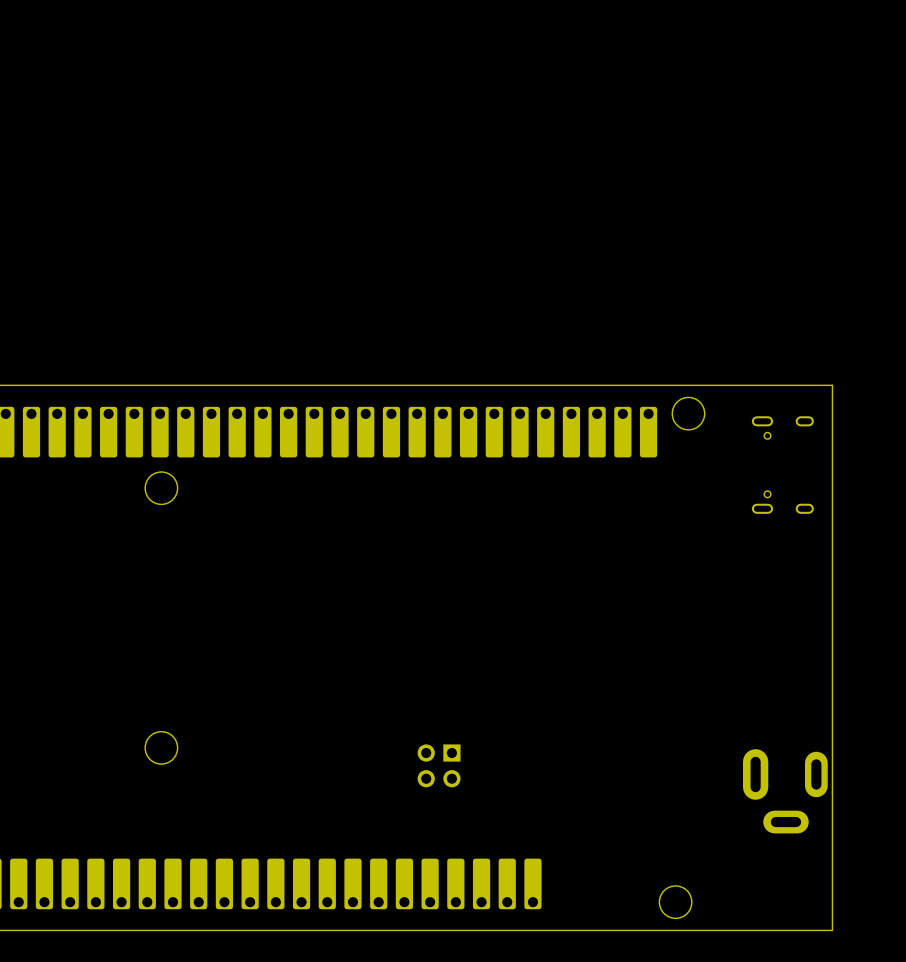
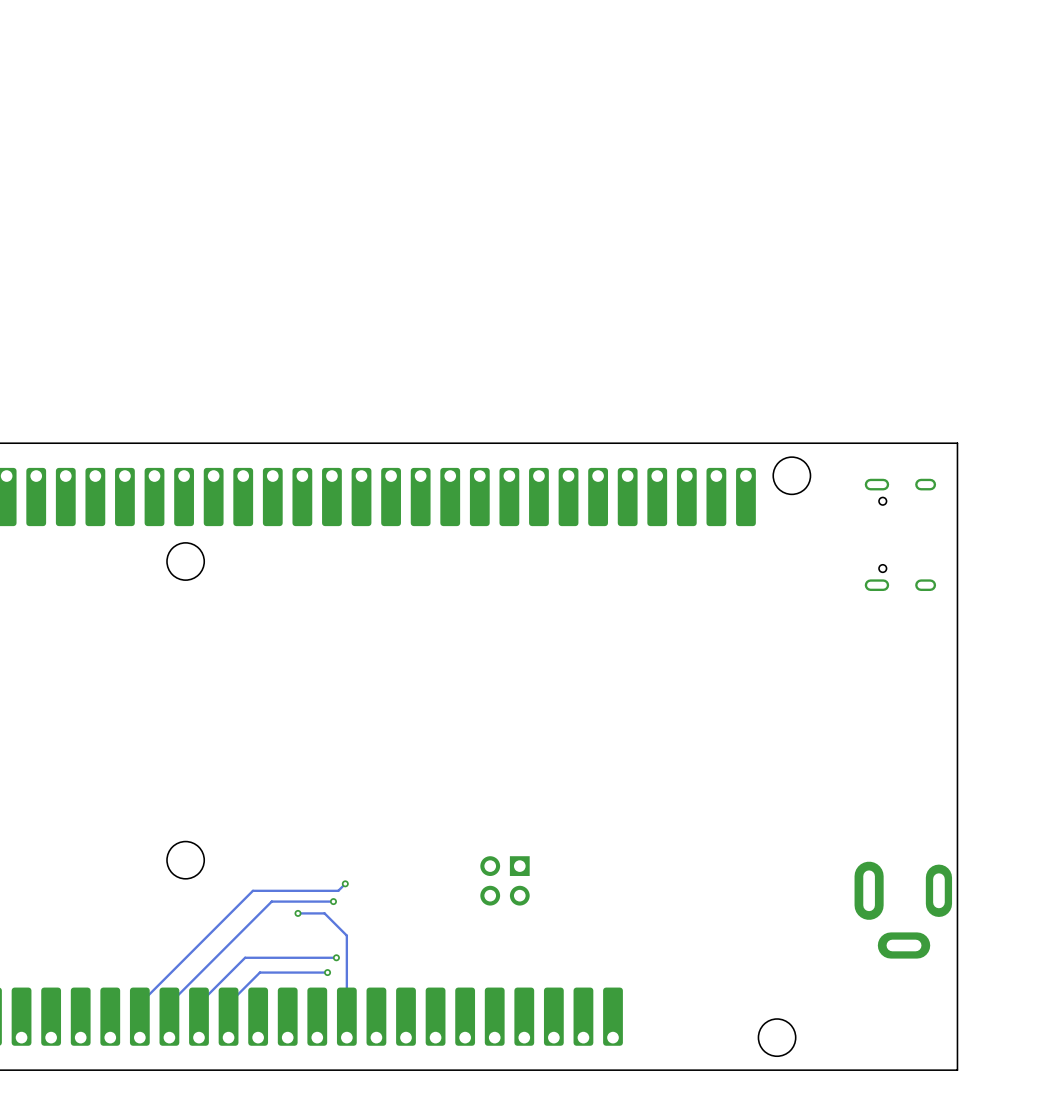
track: none -> (345, 883) (338, 890) (252, 890) (139, 1003) (139, 1037)
via: none -> (345, 883)
track: none -> (333, 901) (271, 901) (169, 1003) (169, 1037)
via: none -> (333, 901)
track: none -> (297, 913) (324, 913) (346, 935) (346, 1037)
via: none -> (297, 913)
track: none -> (336, 957) (245, 957) (198, 1003) (198, 1037)
via: none -> (336, 957)
track: none -> (327, 972) (259, 972) (228, 1003) (228, 1037)
via: none -> (327, 972)

